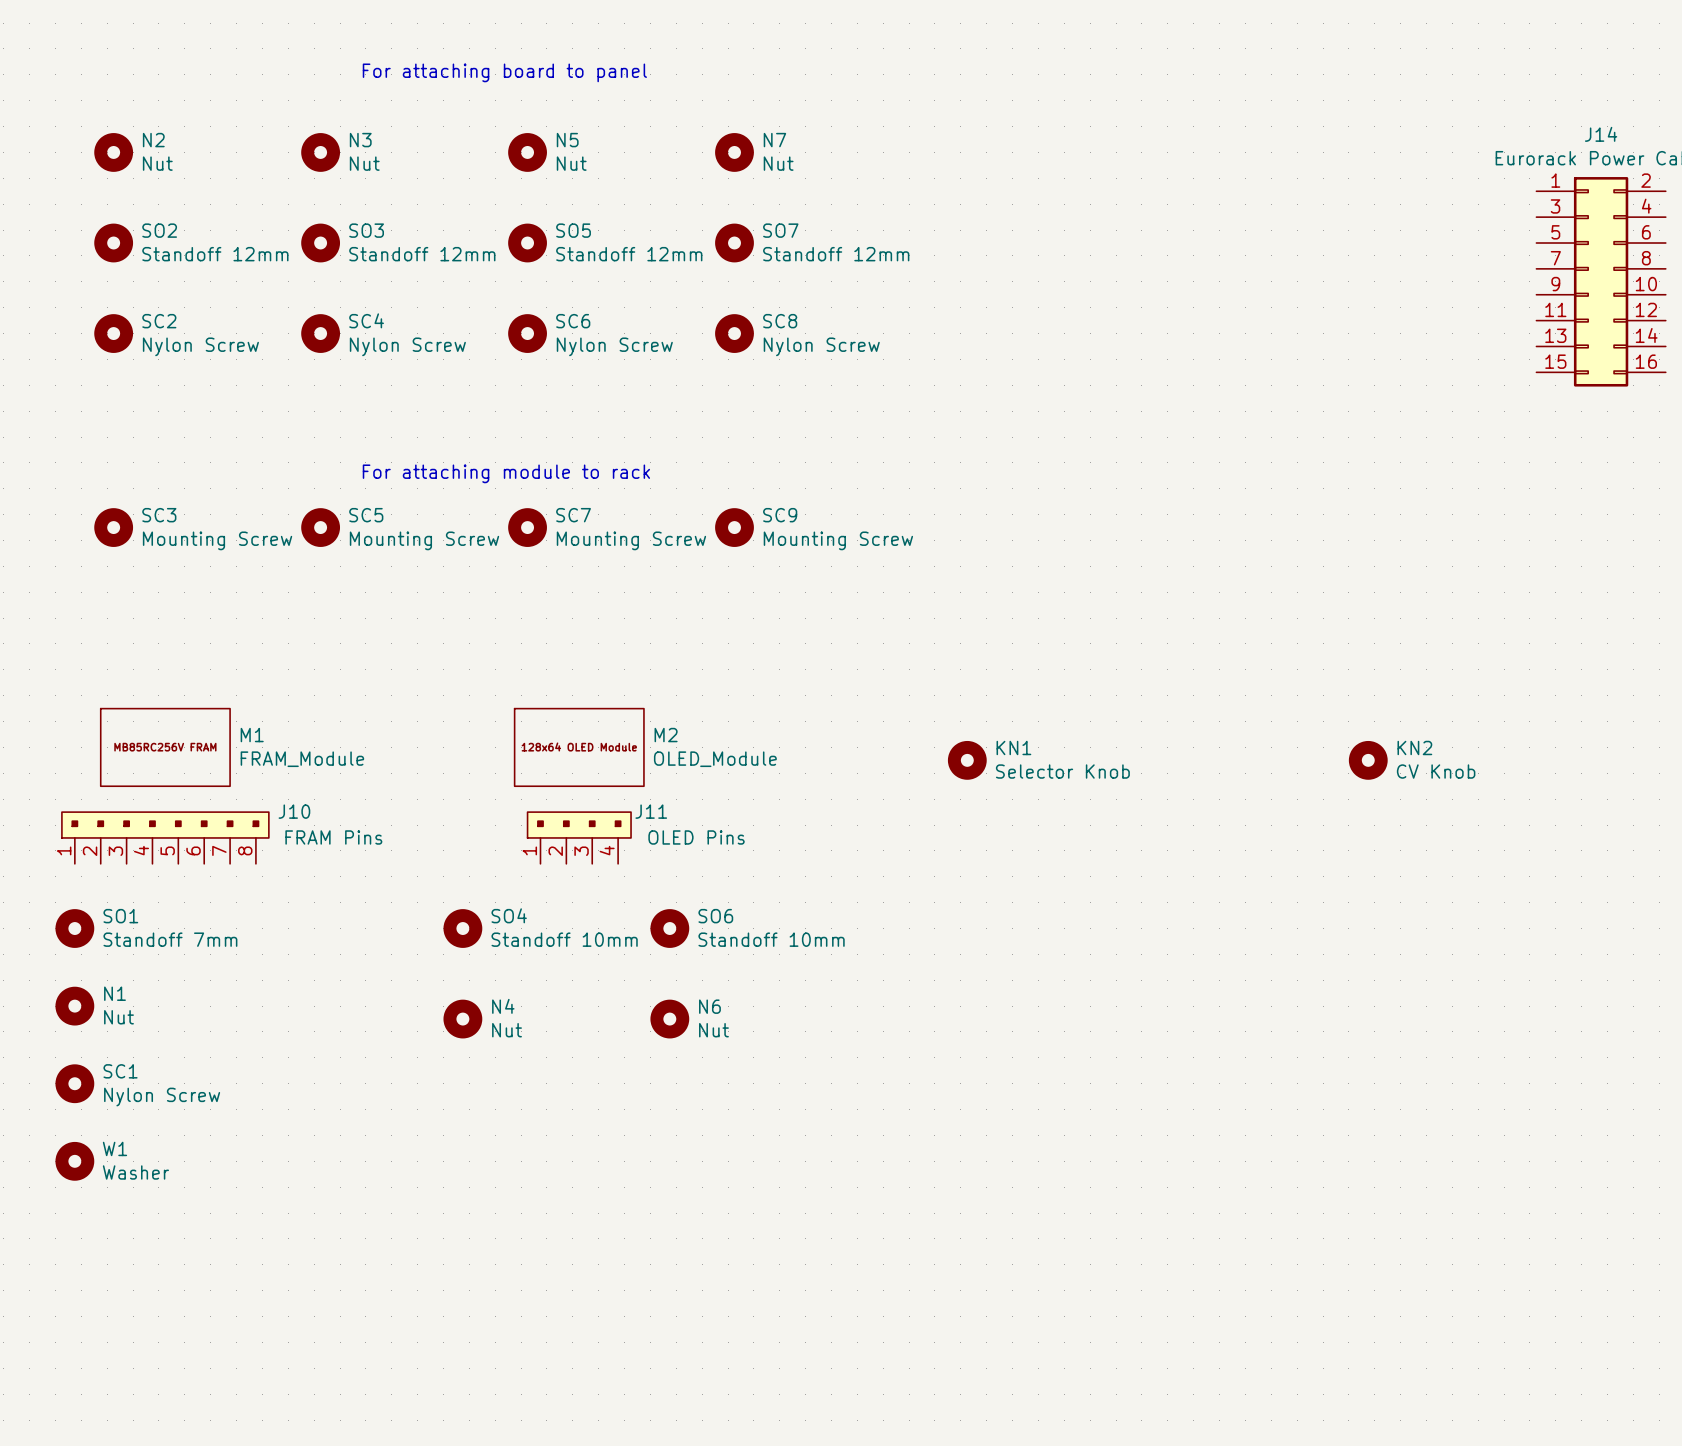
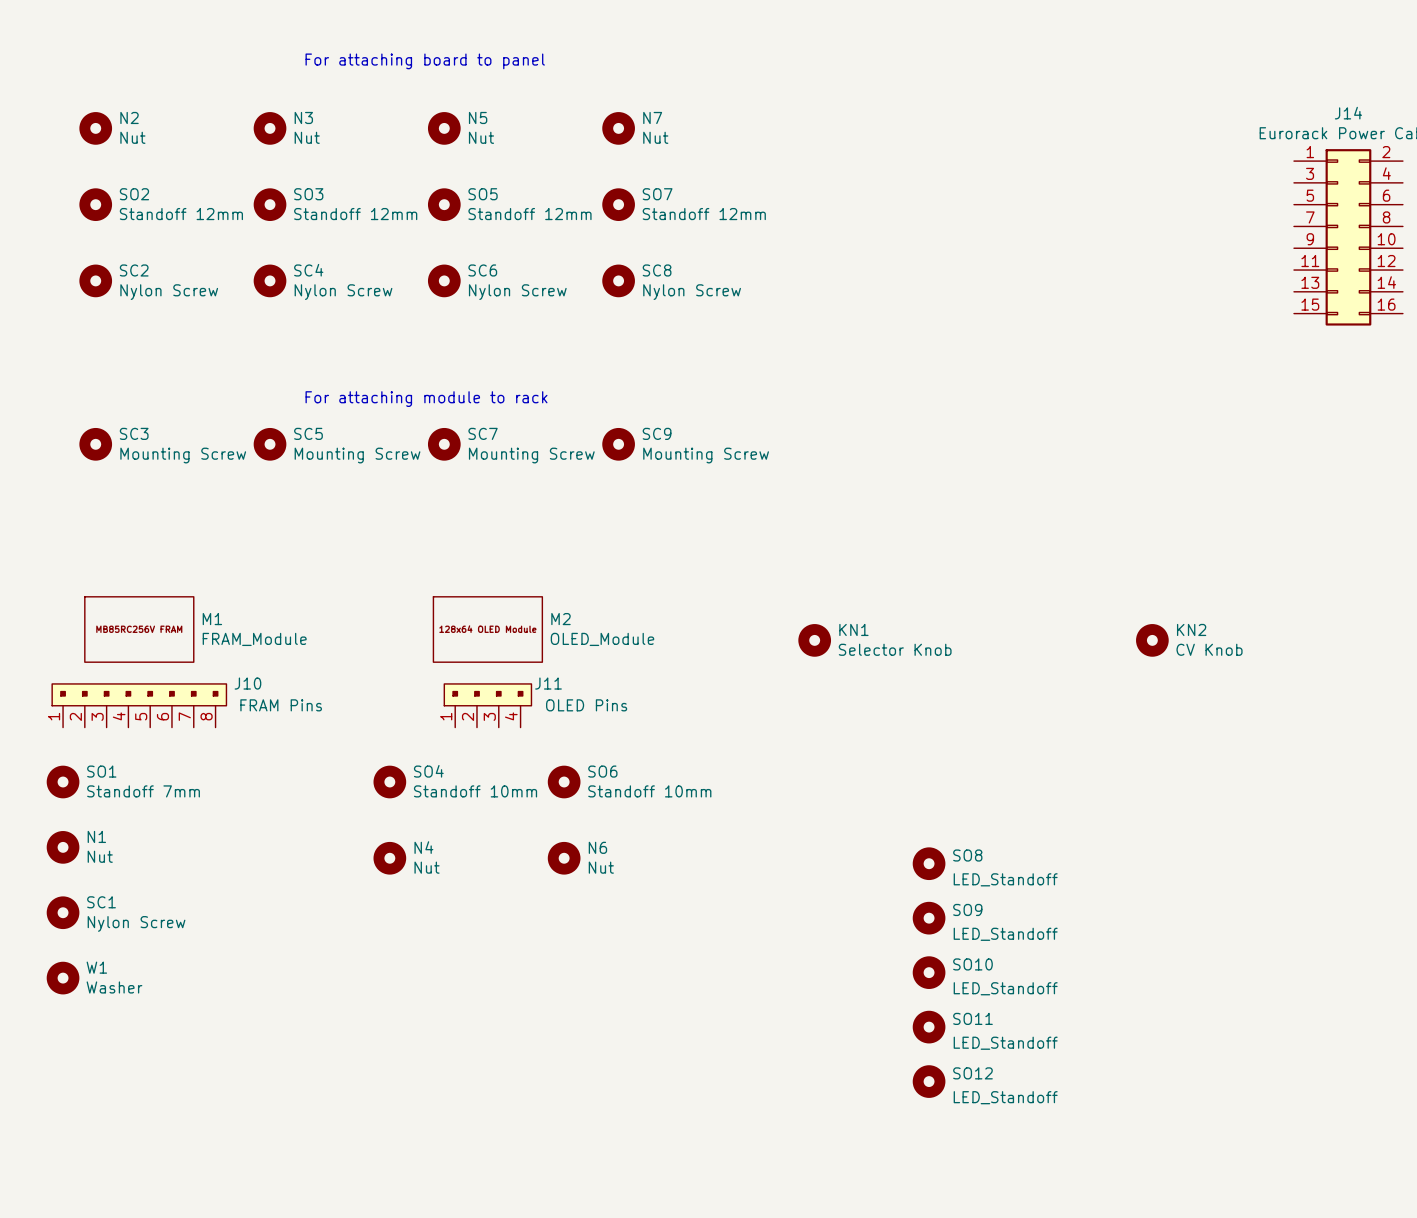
SO8: none -> LED_Standoff (929, 863)
SO9: none -> LED_Standoff (929, 918)
SO10: none -> LED_Standoff (929, 972)
SO11: none -> LED_Standoff (929, 1027)
SO12: none -> LED_Standoff (929, 1081)

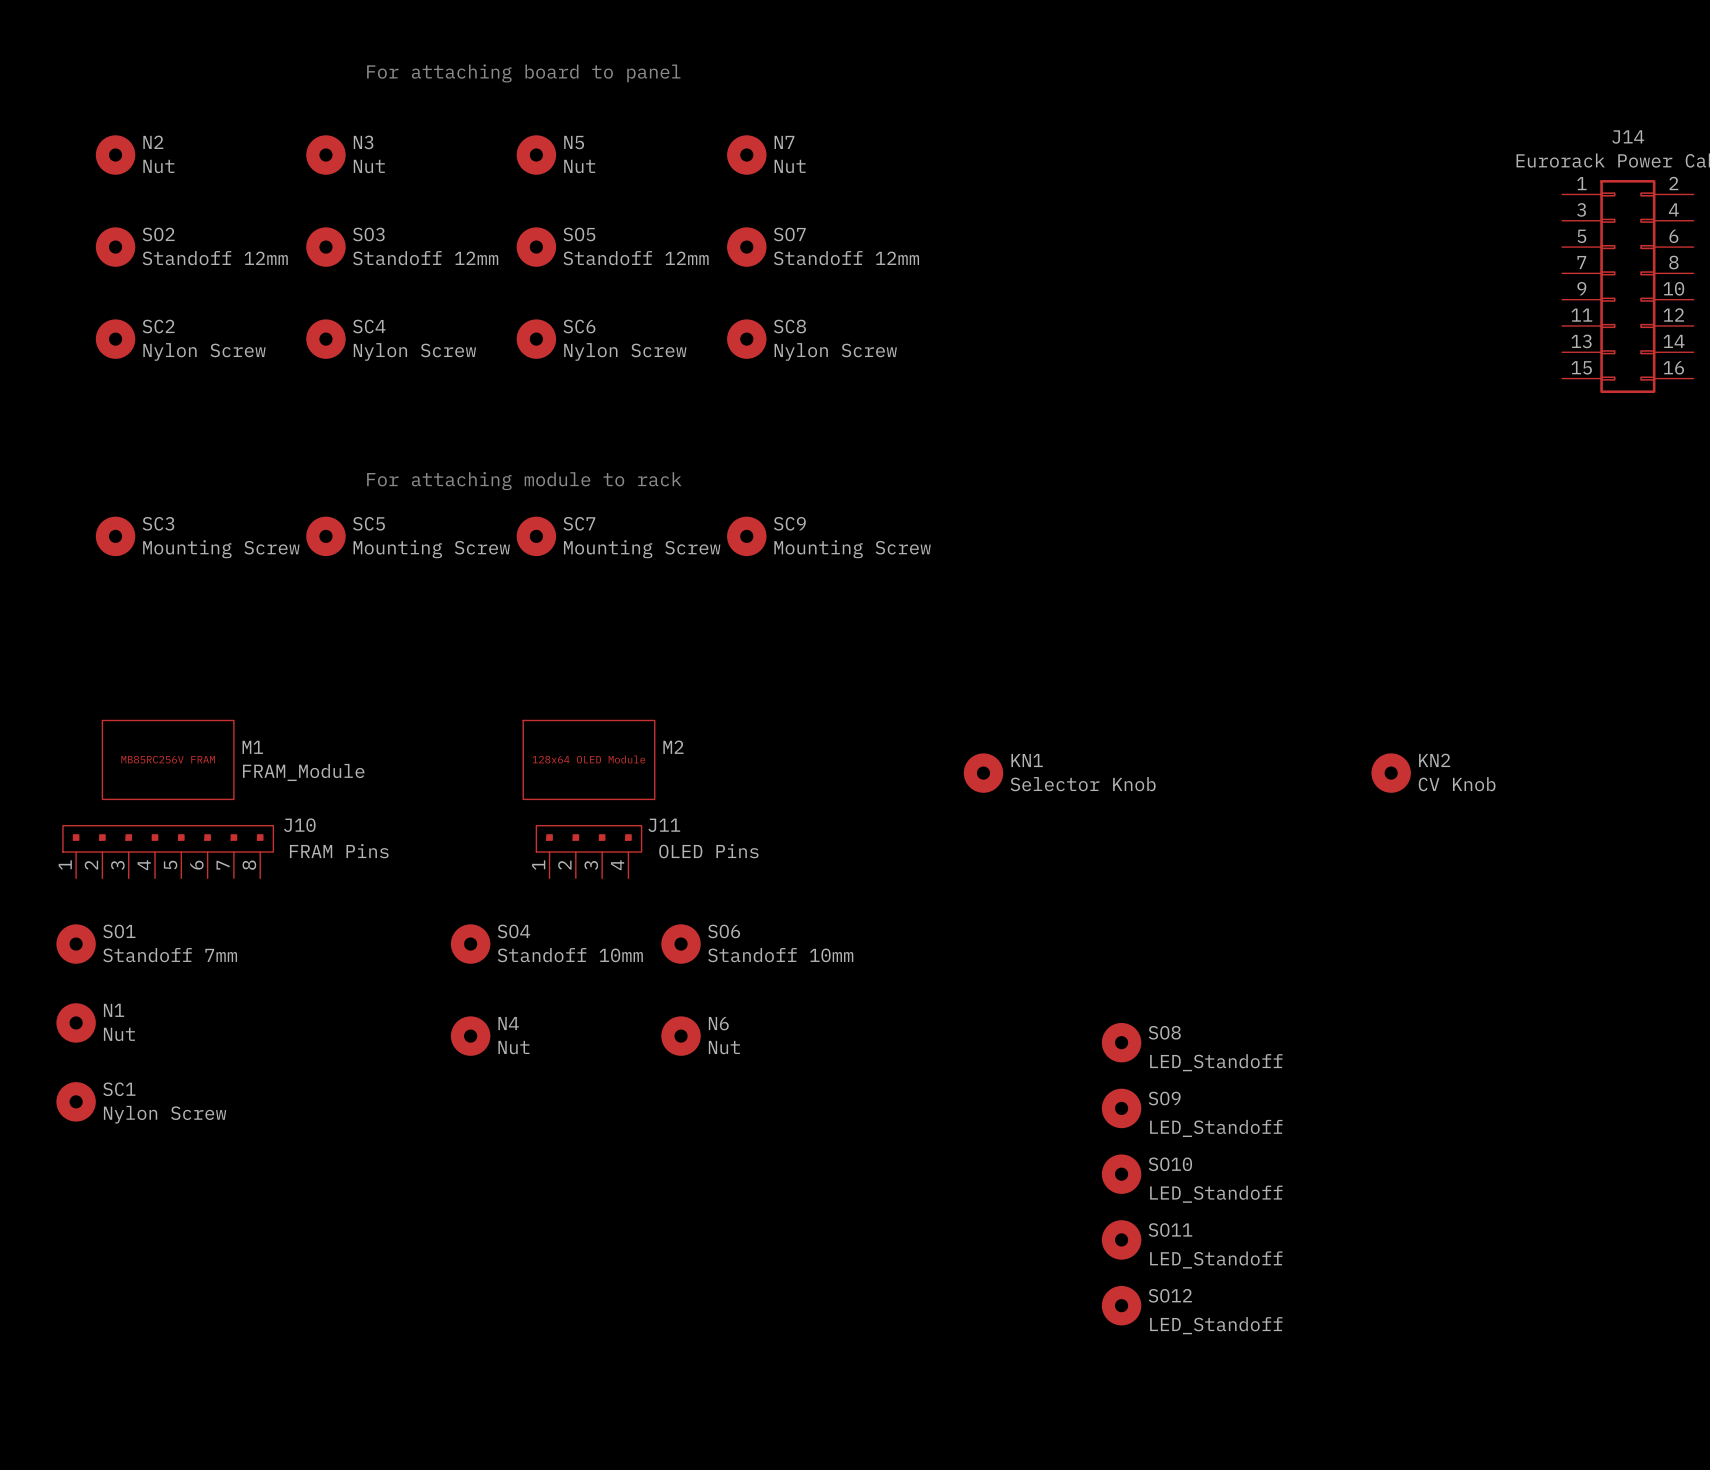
M2 value: OLED_Module (602, 639) -> none
W1: Washer (63, 978) -> none

